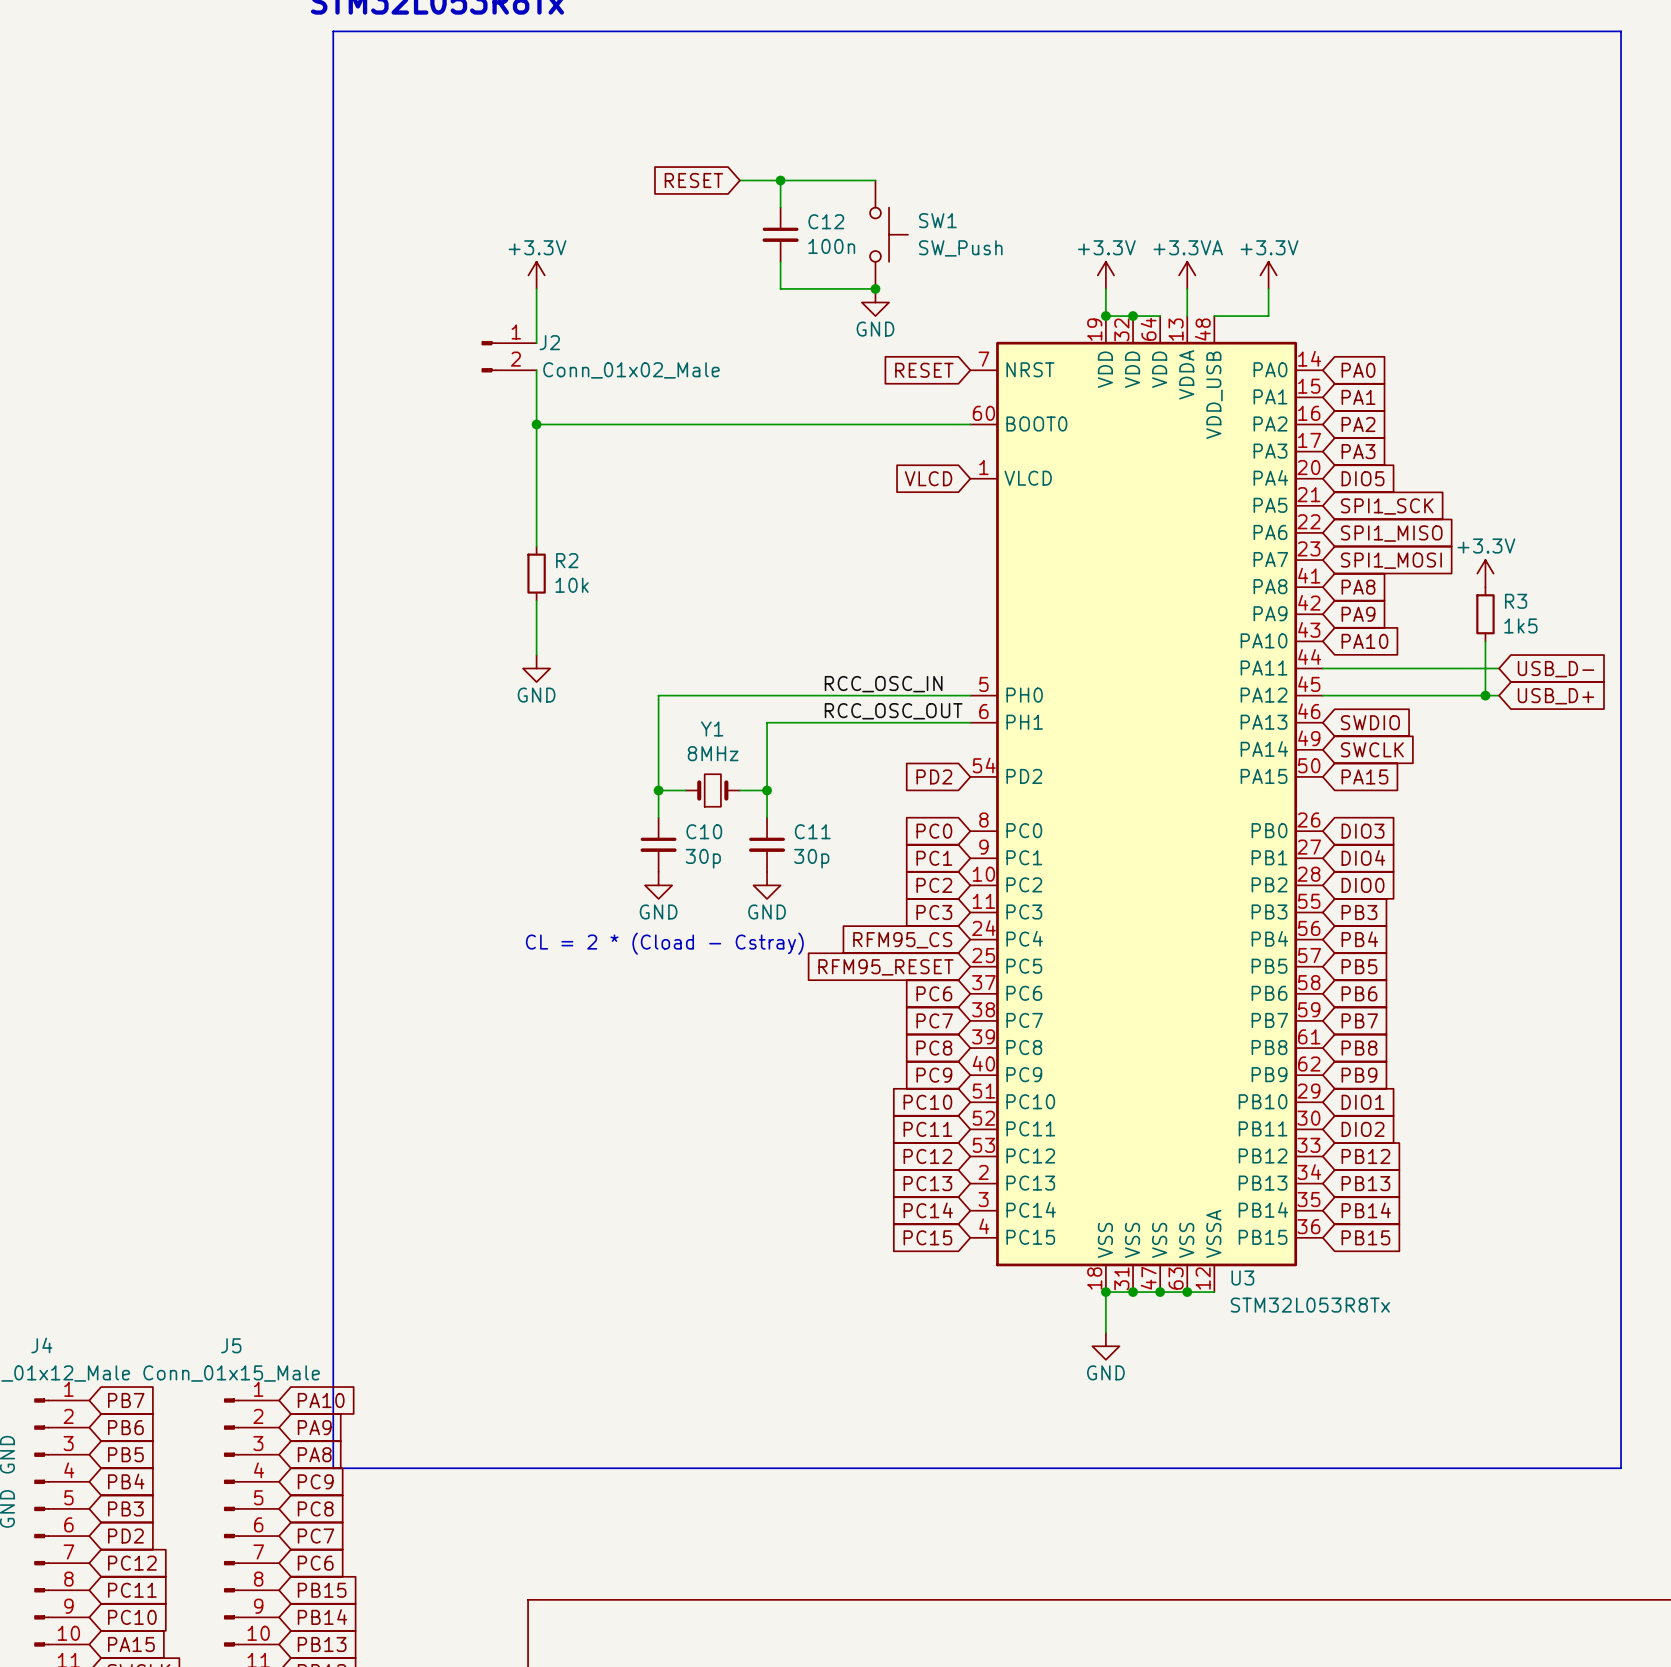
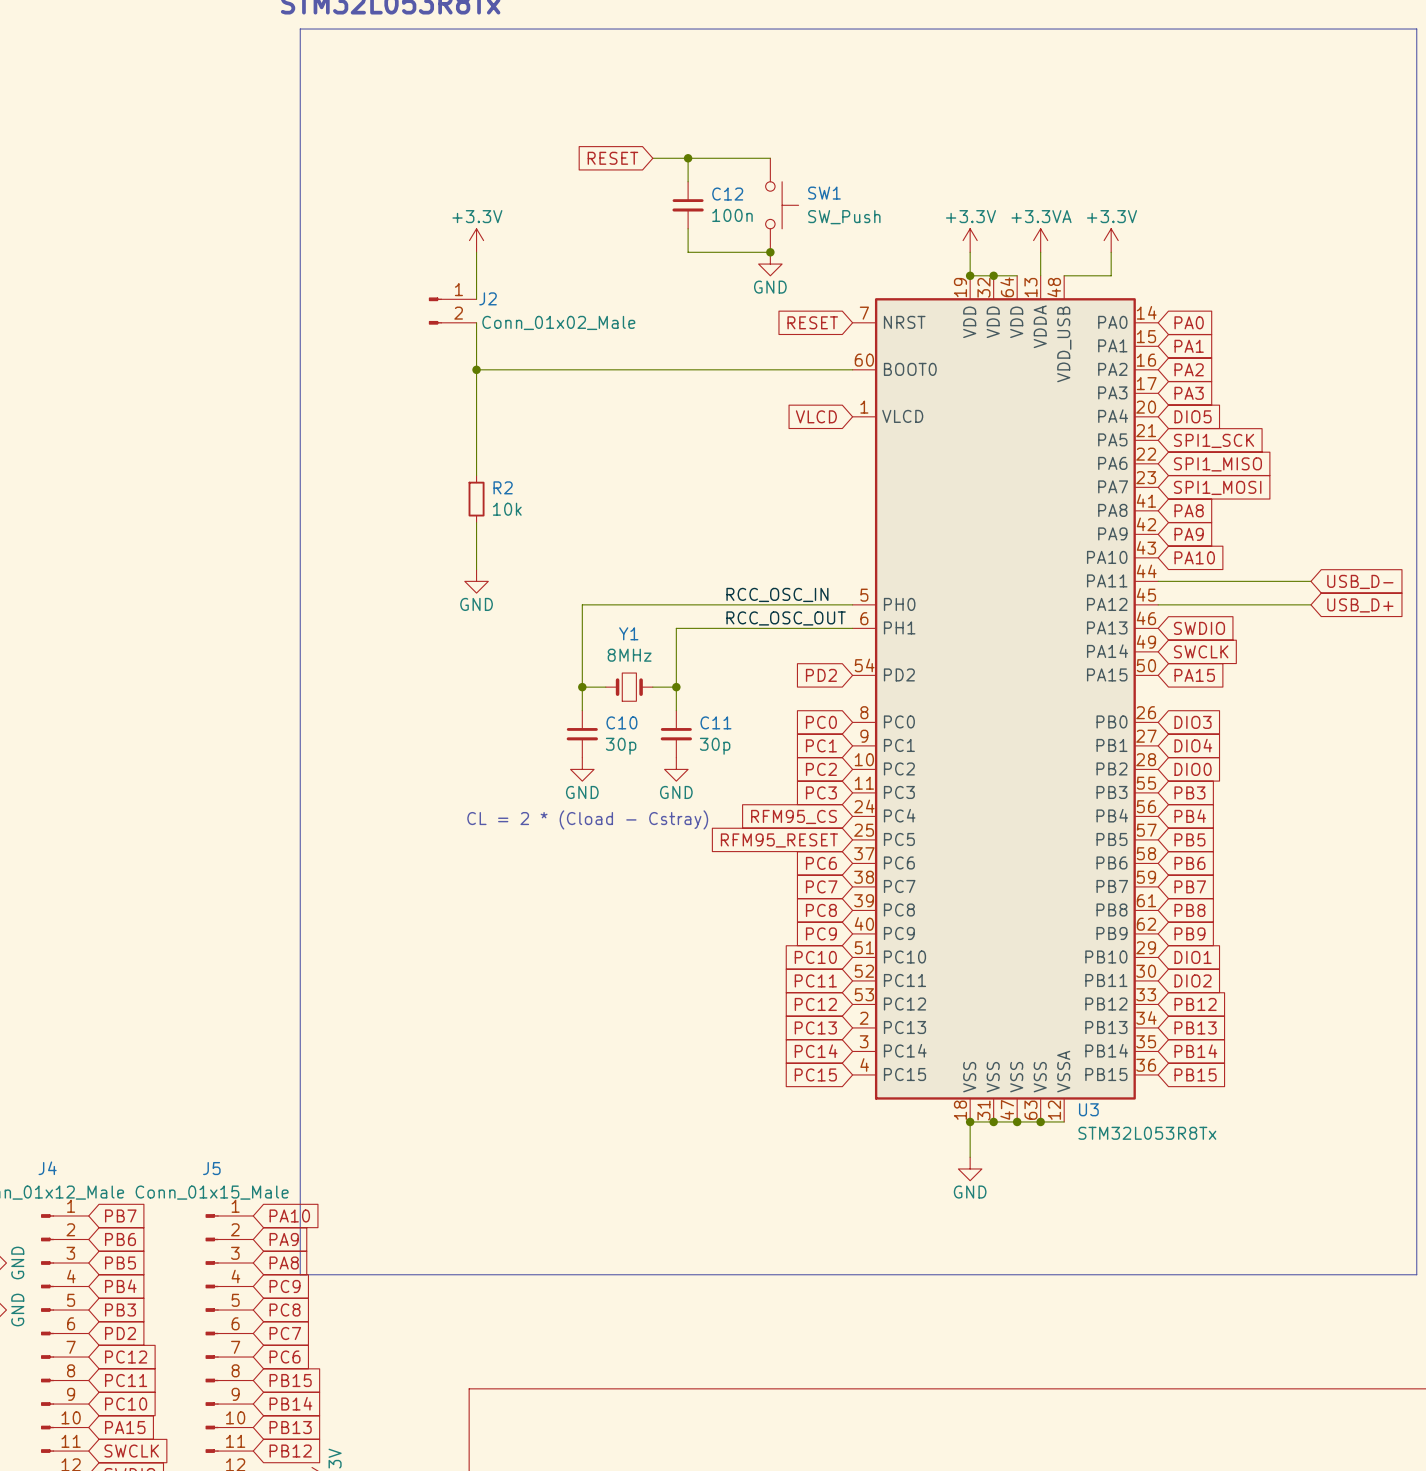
power symbol: +3.3V (1485, 573) -> none
R3: 1k5 (1485, 614) -> none
wire: (1485, 641) (1485, 695) -> none
junction: (1485, 695) -> none

